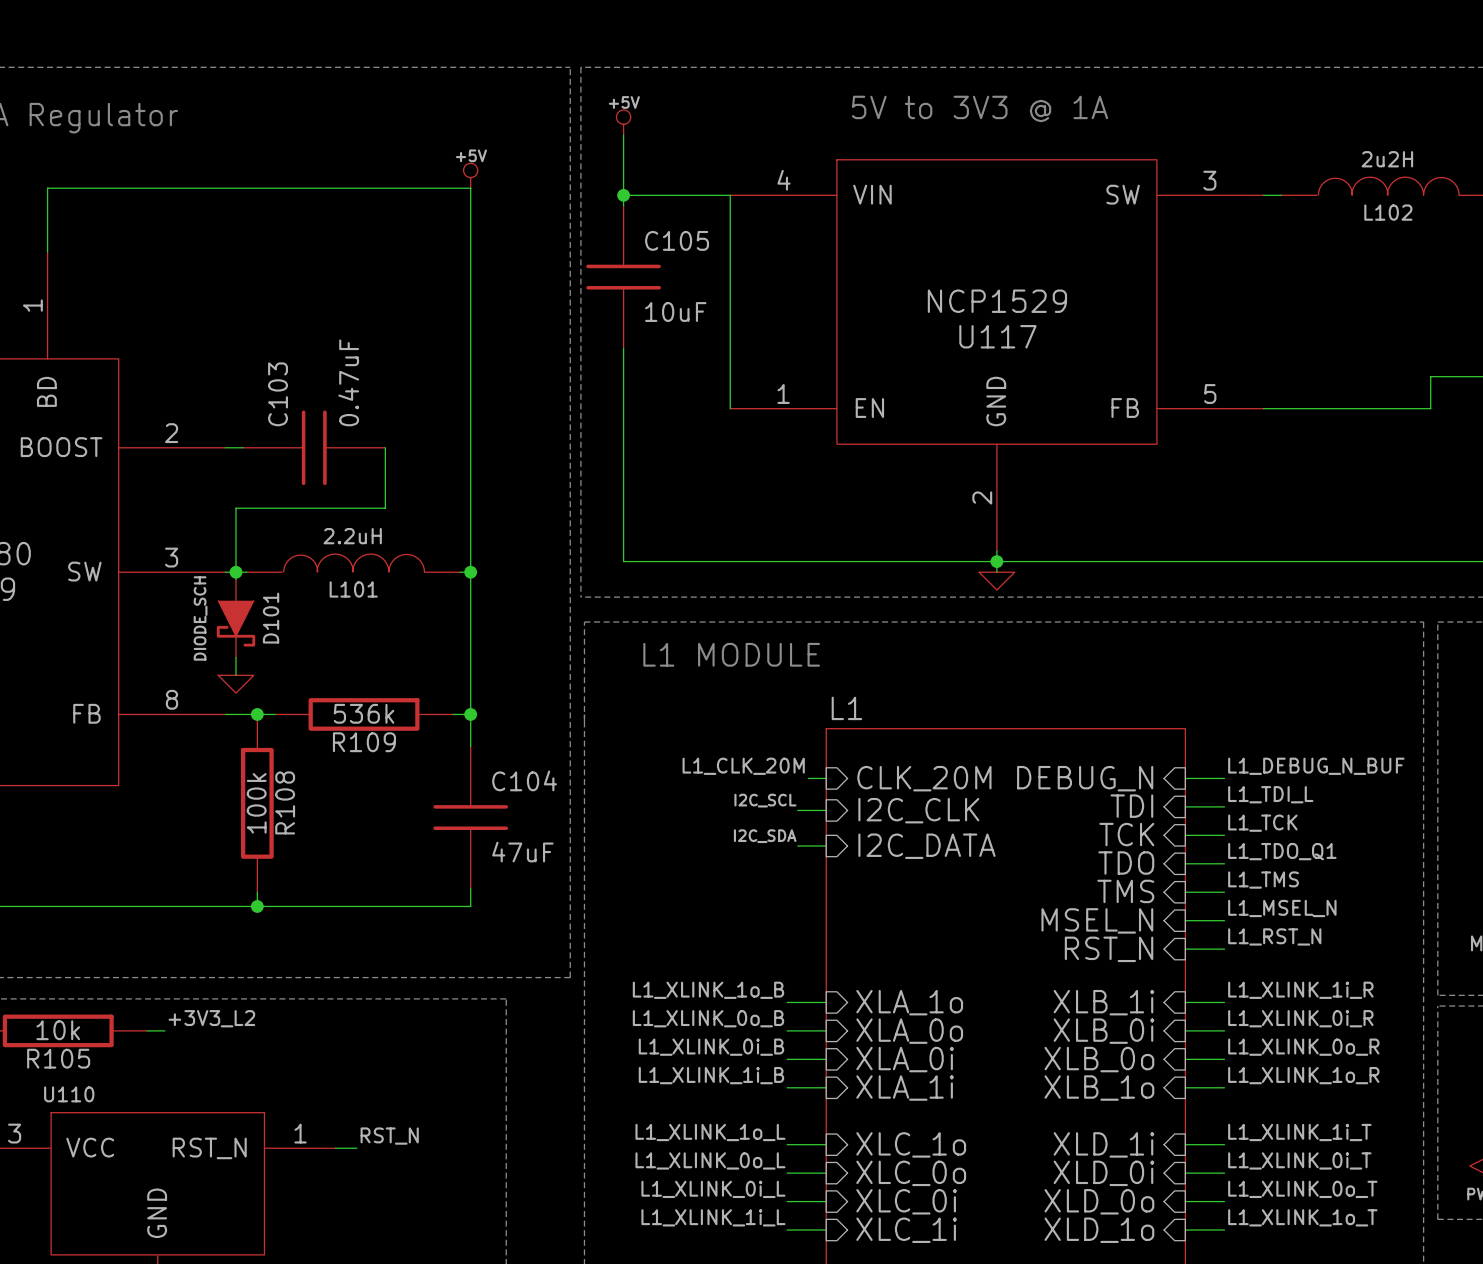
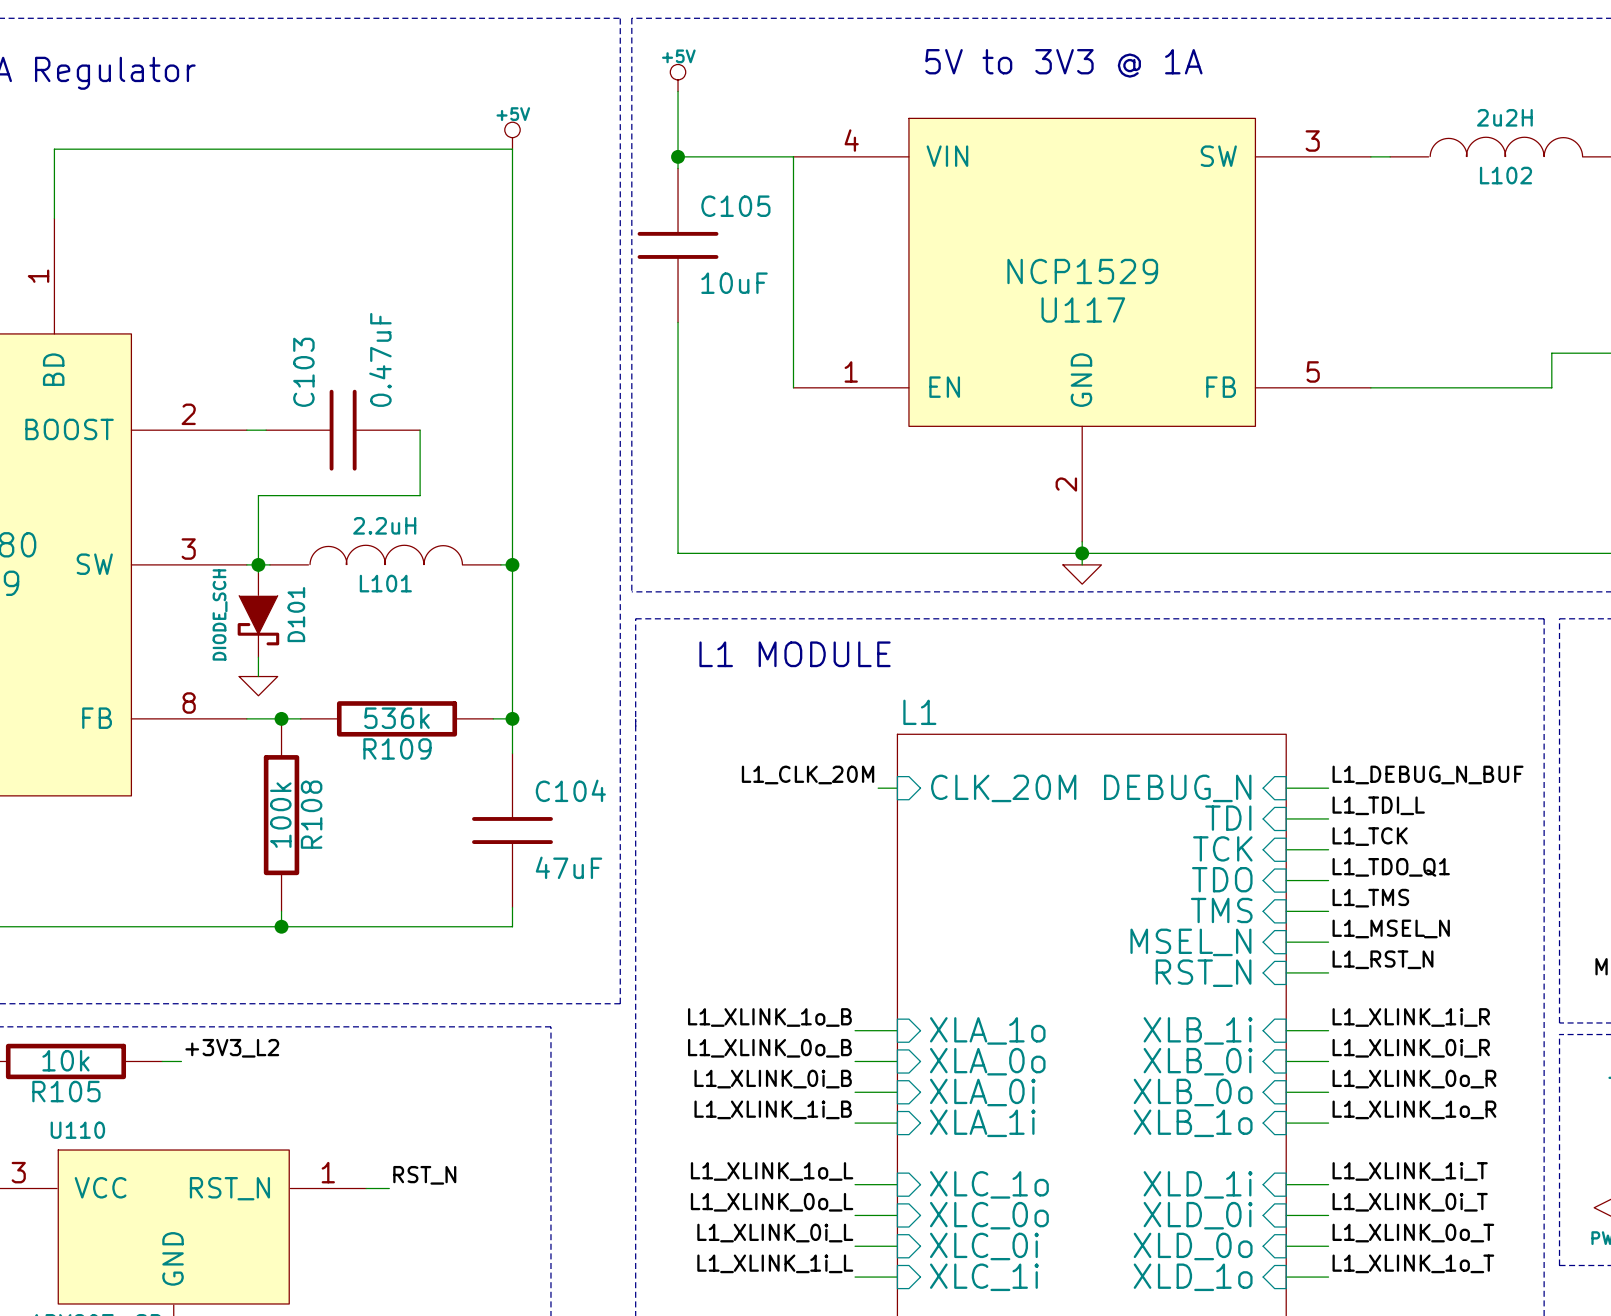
label: I2C_SCL (765, 800) -> none
wire: (797, 810) (826, 810) -> none
sheet pin: I2C_CLK (918, 810) -> none
label: I2C_SDA (765, 836) -> none
wire: (797, 846) (826, 846) -> none
sheet pin: I2C_DATA (926, 846) -> none

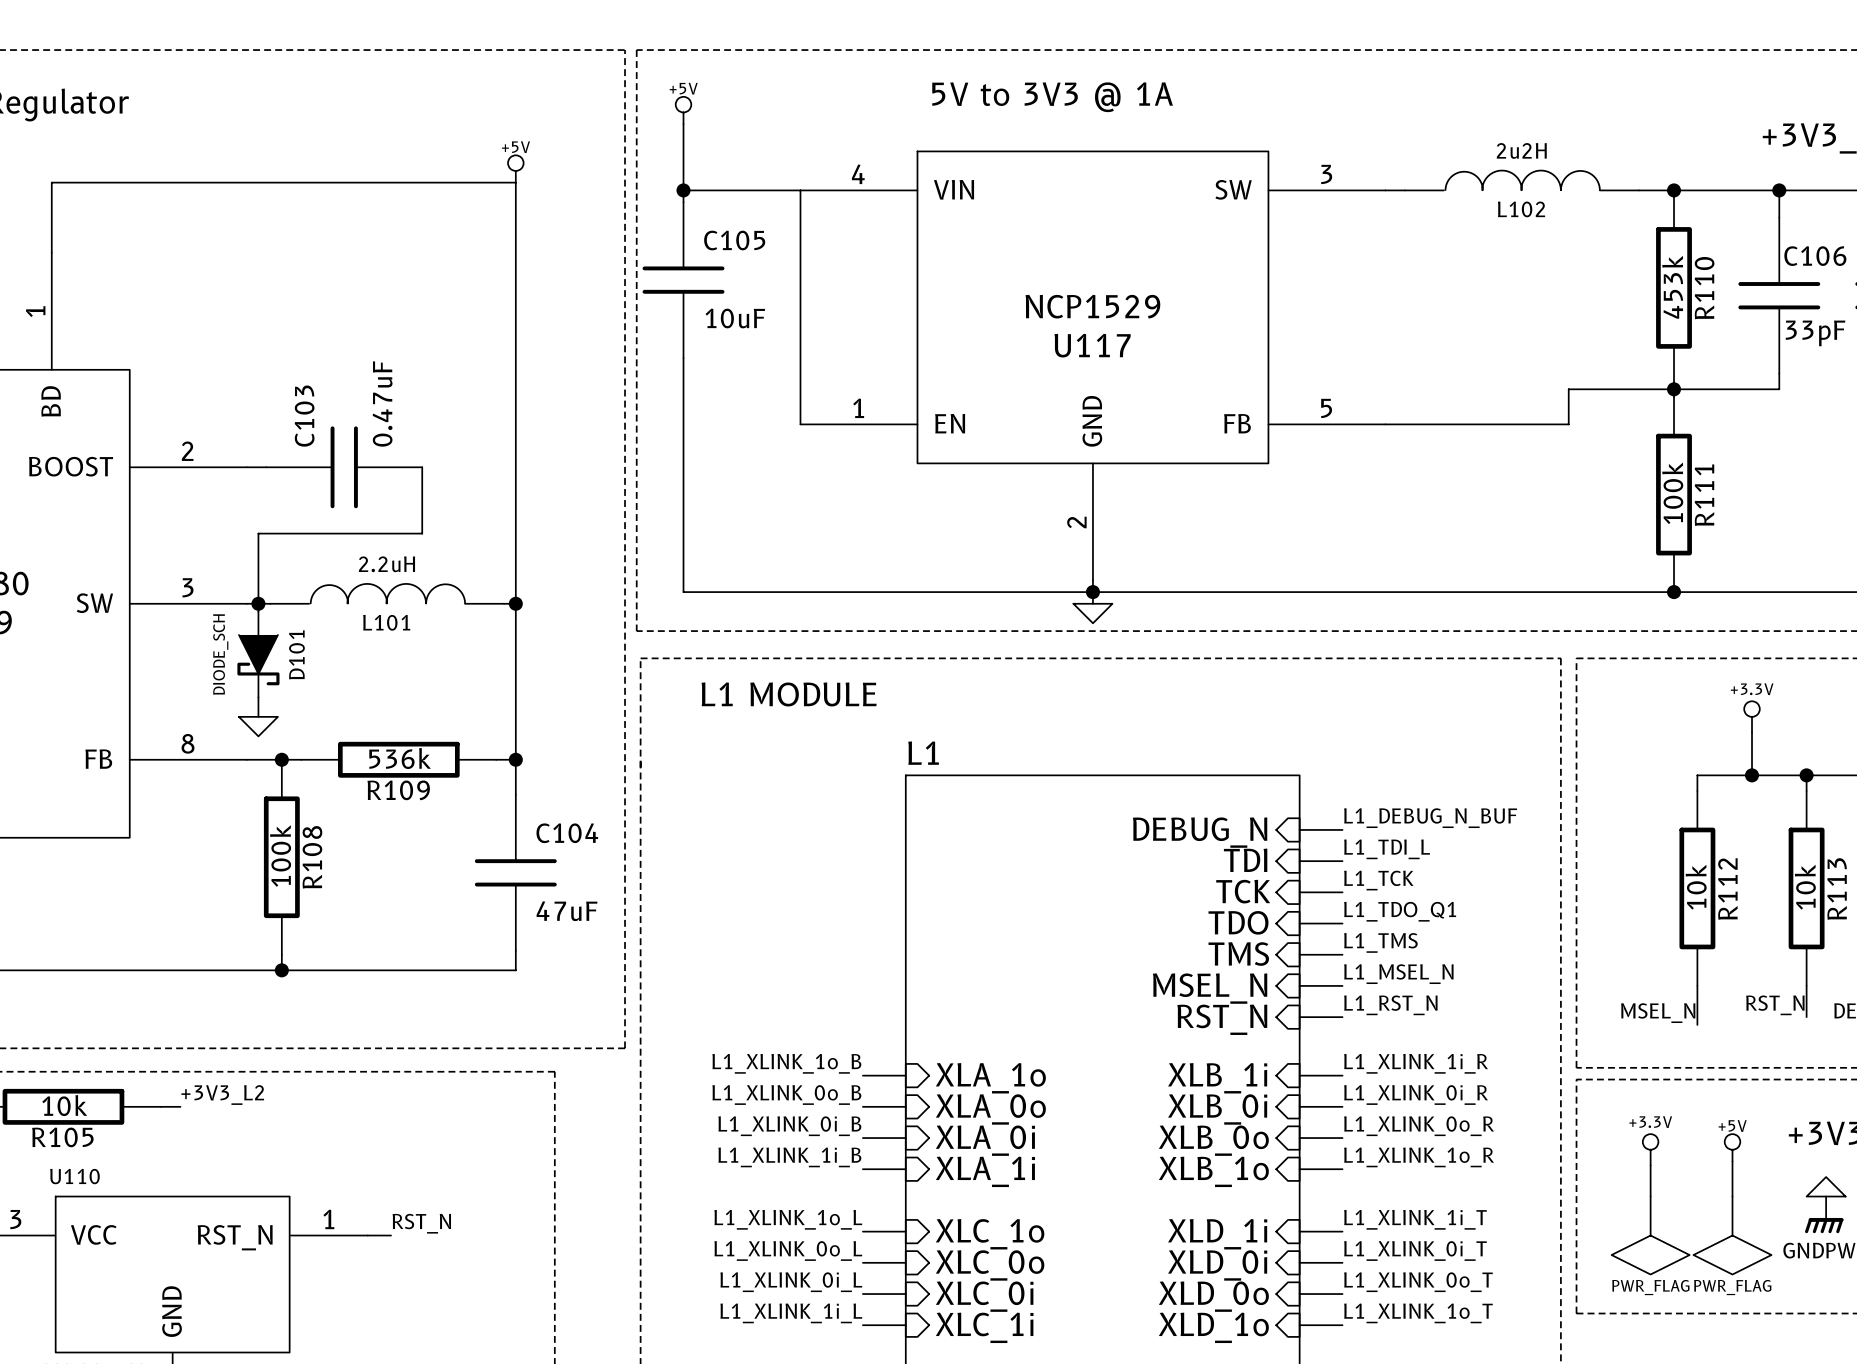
label: L1_CLK_20M (808, 774) -> none
wire: (878, 788) (897, 788) -> none
sheet pin: CLK_20M (1003, 788) -> none

